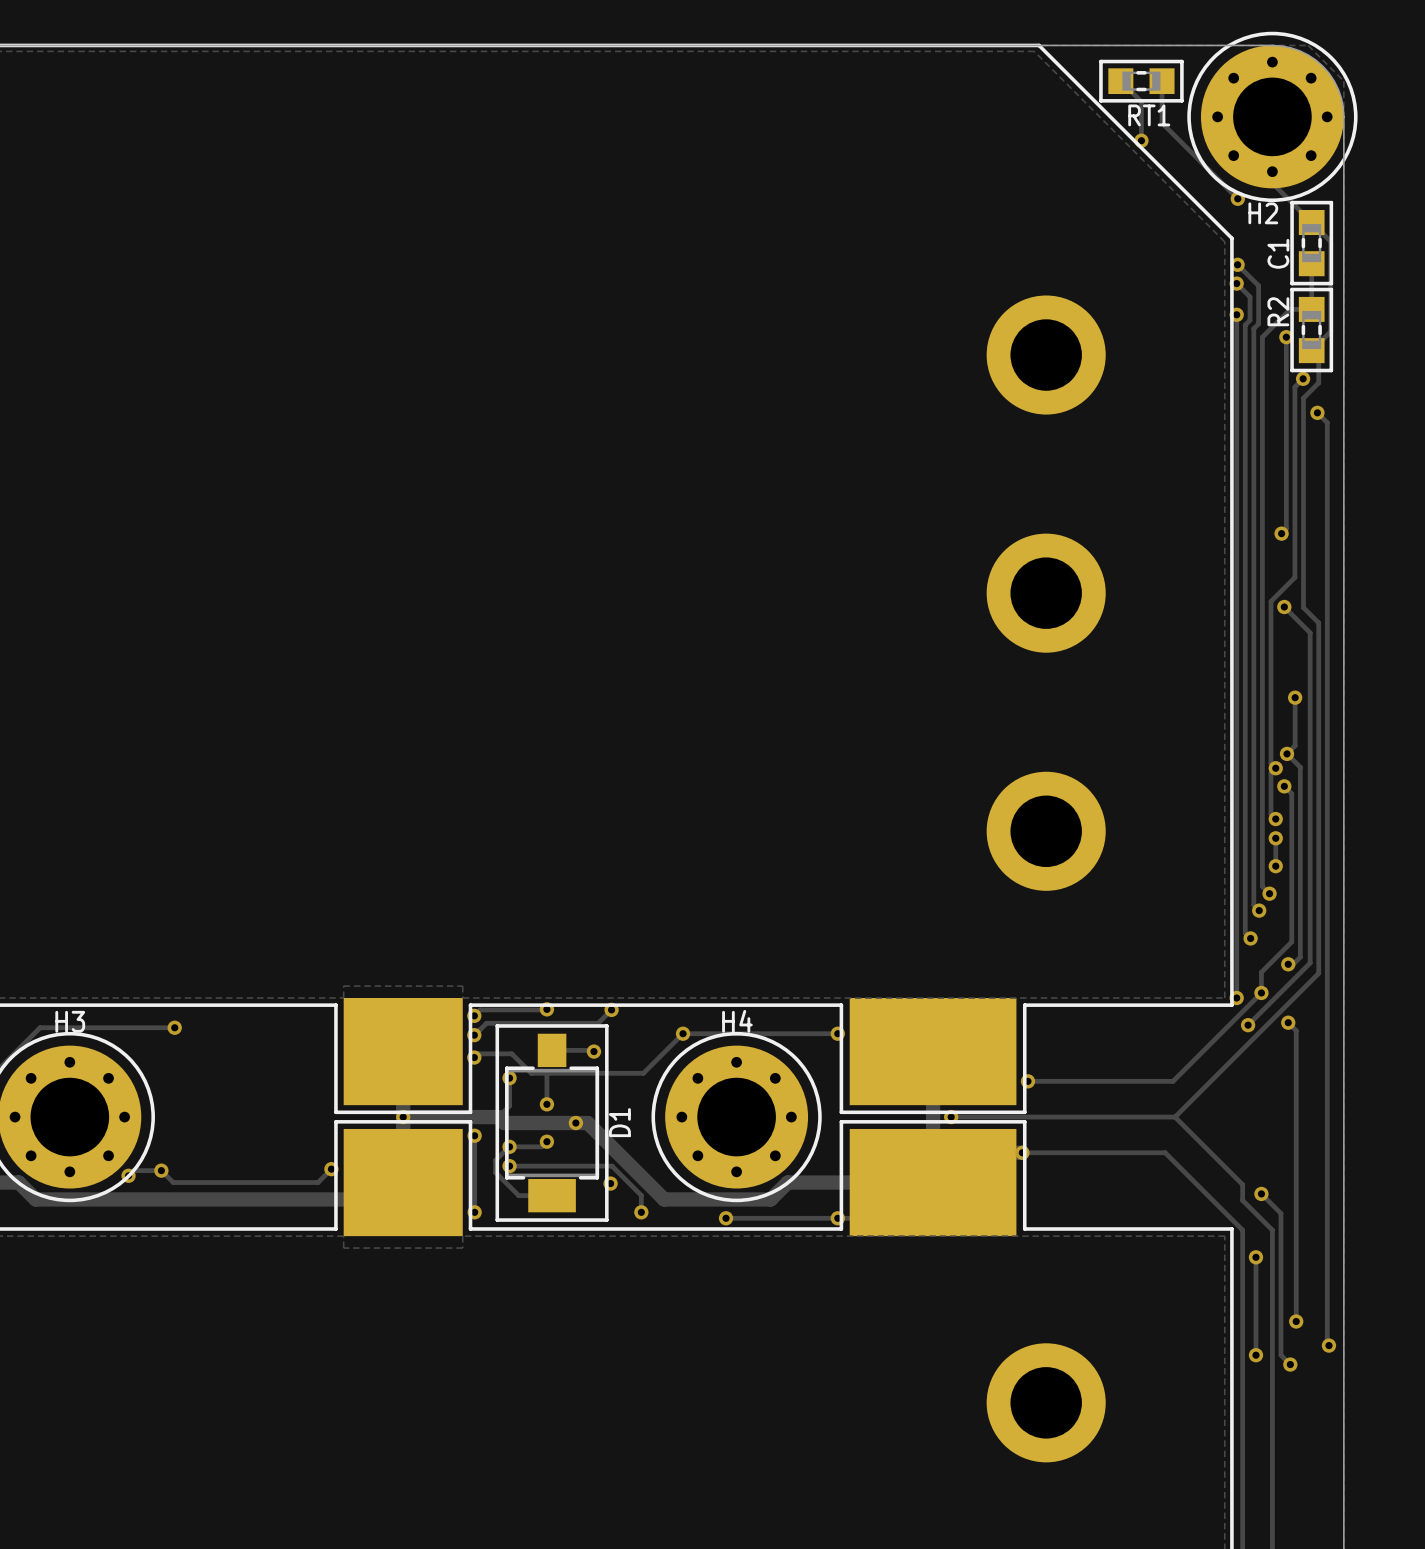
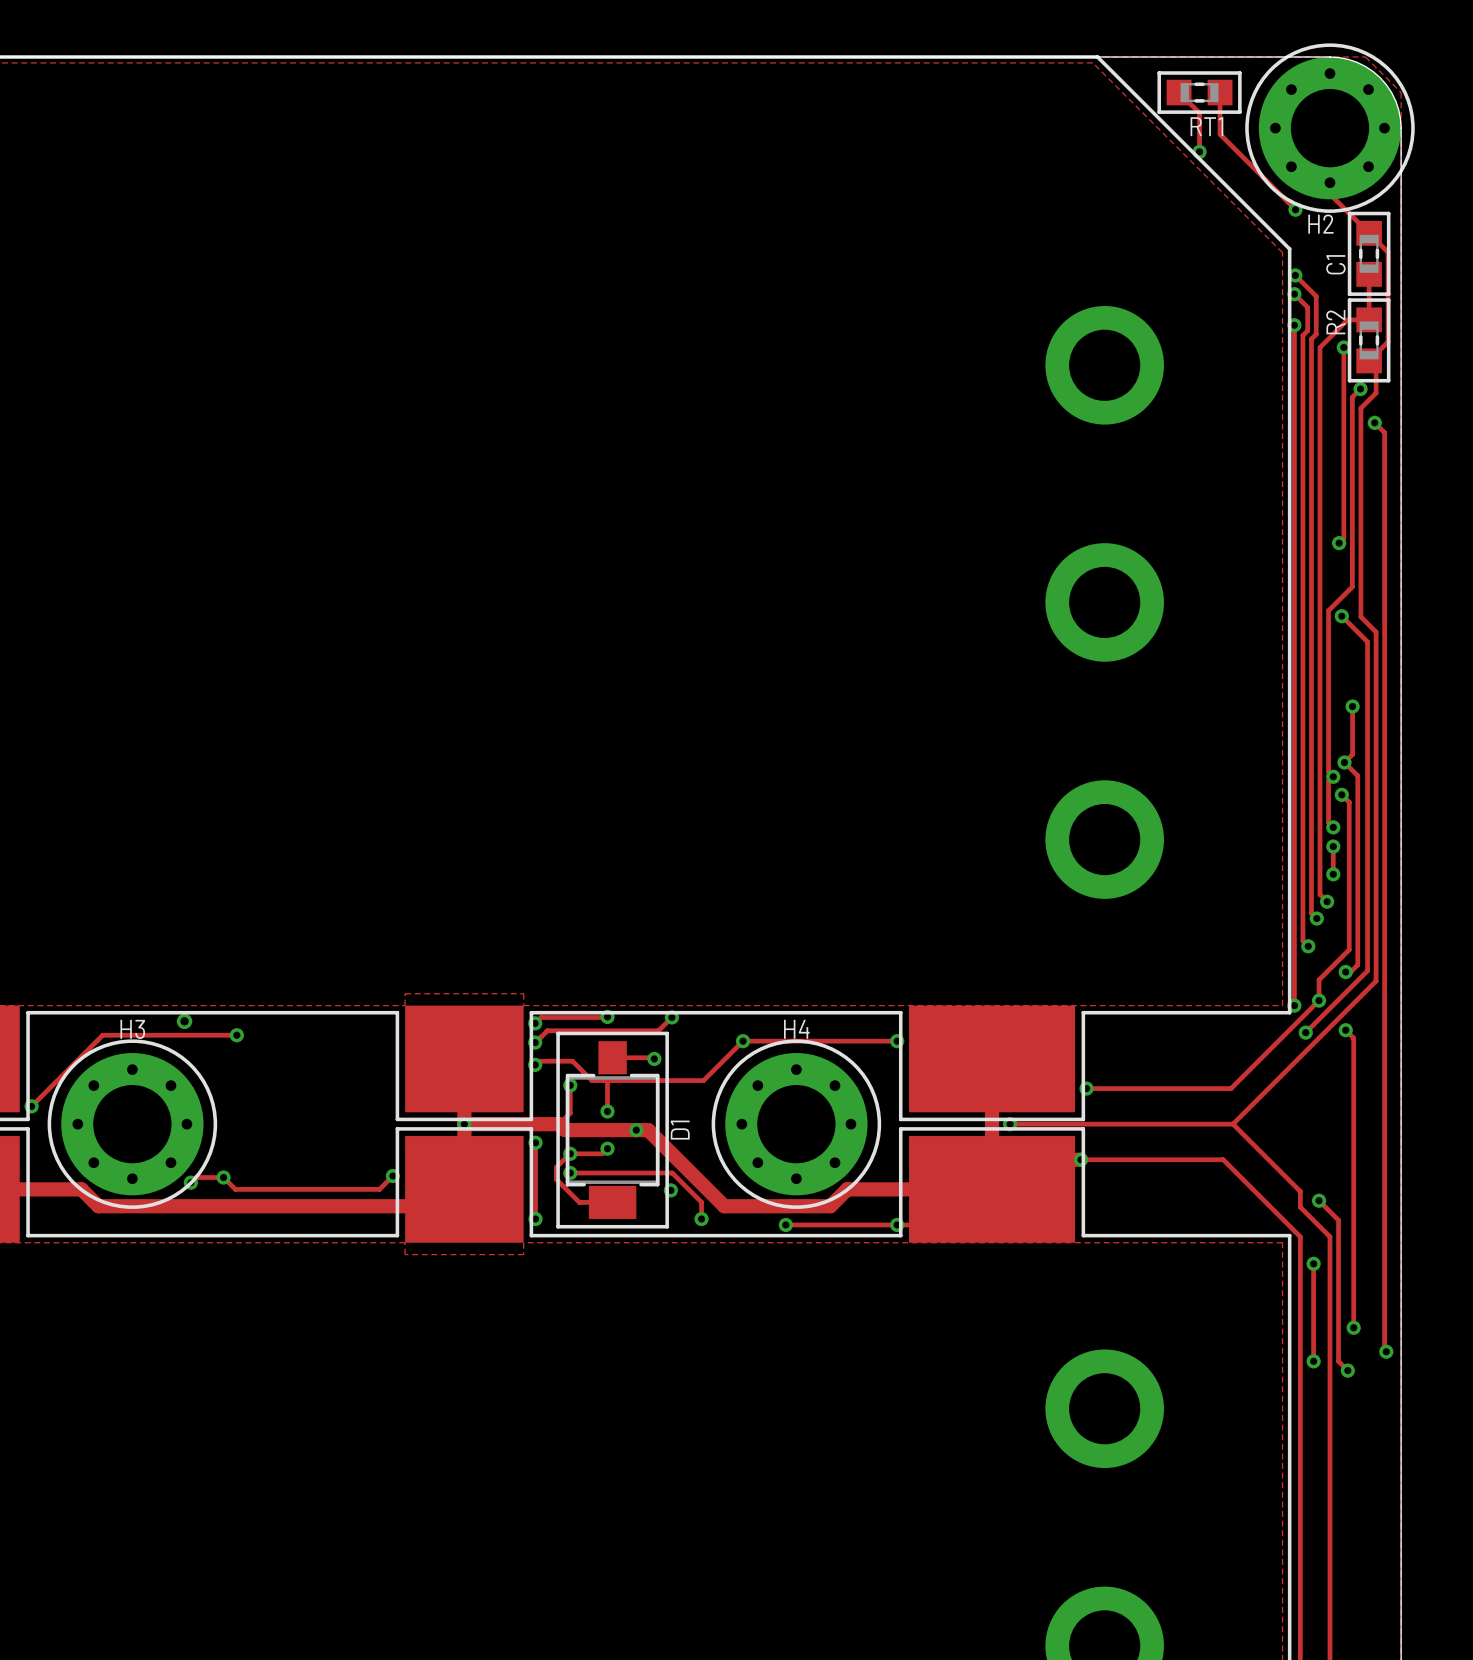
via: none -> (184, 1021)

